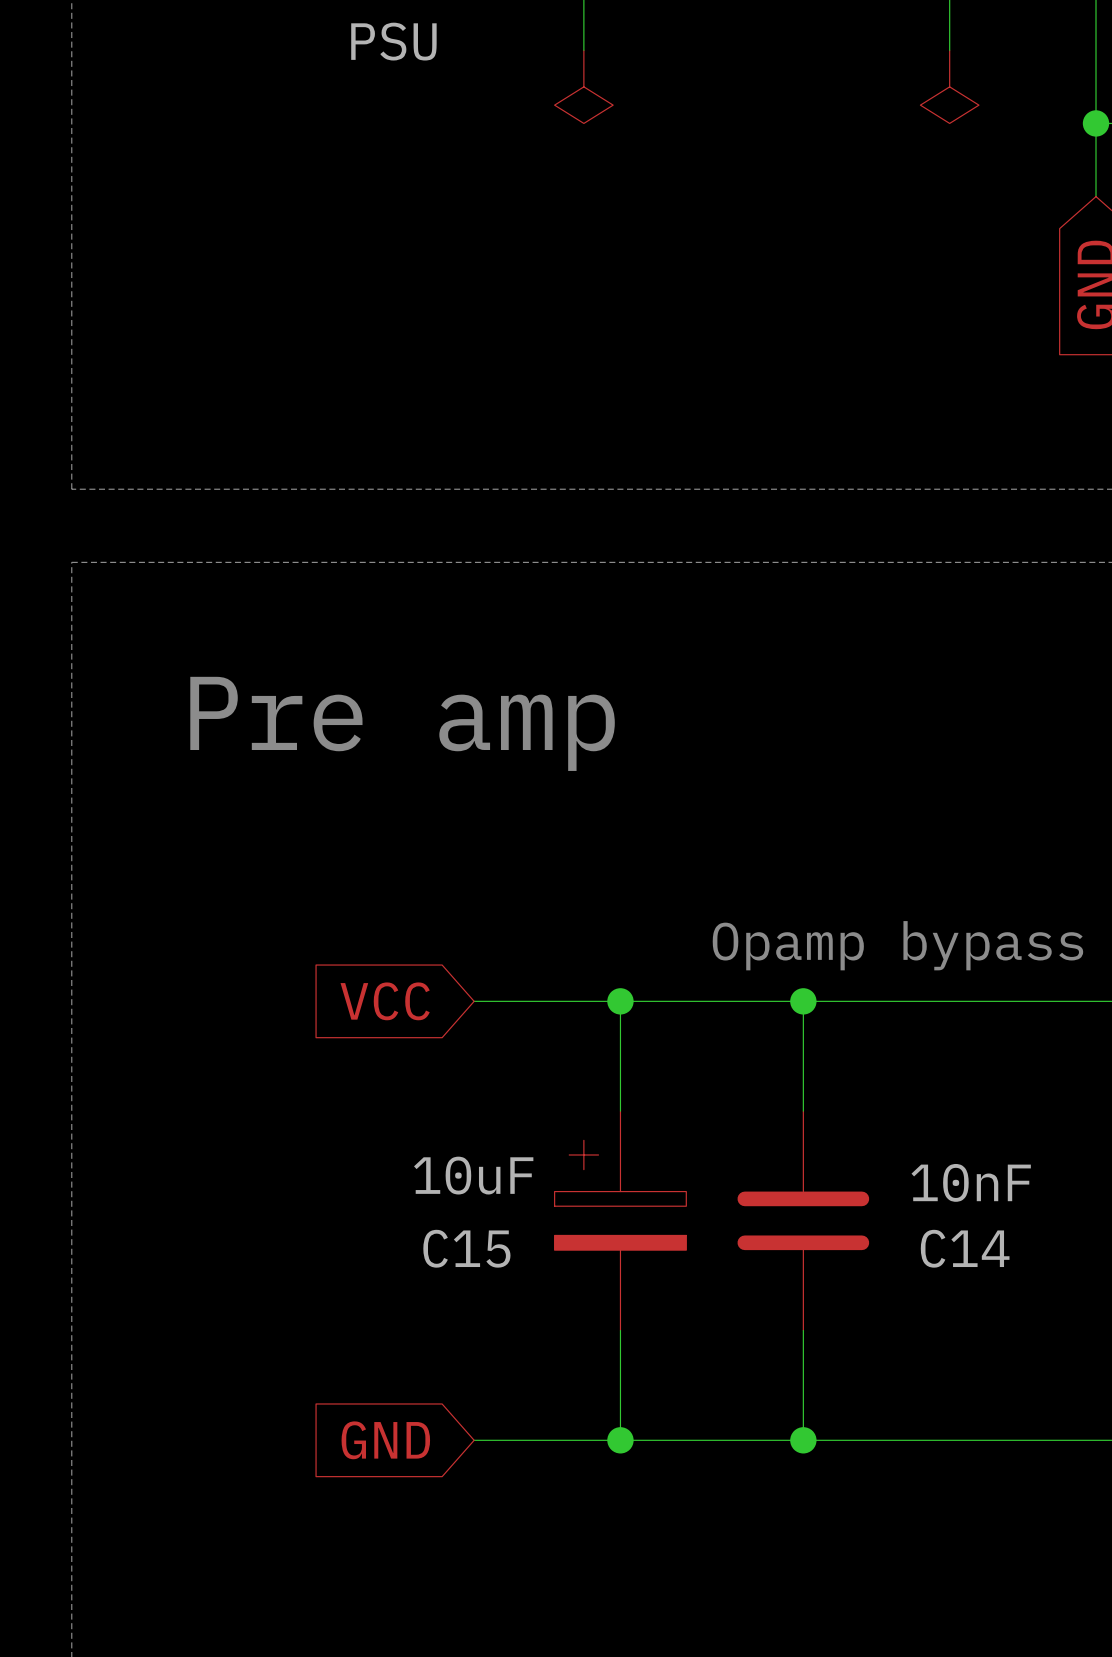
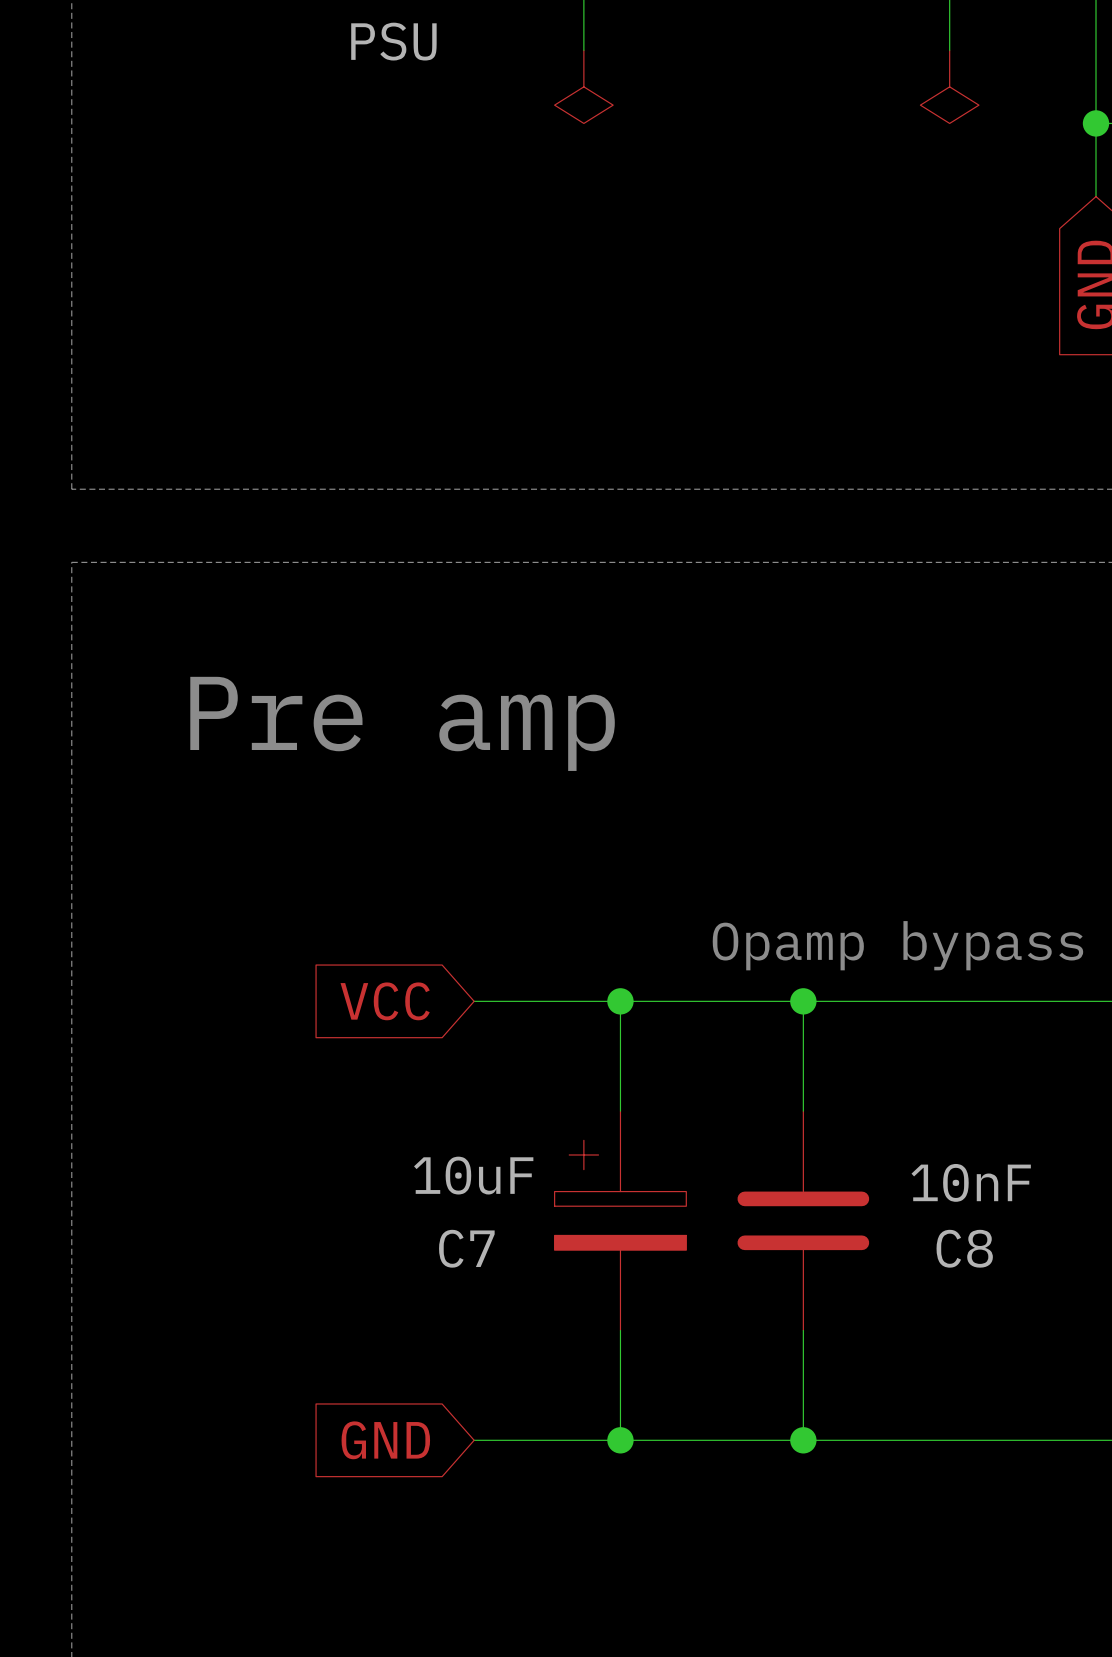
C15 name: C15 (466, 1248) -> C7 (466, 1248)
C14 name: C14 (965, 1248) -> C8 (964, 1248)

